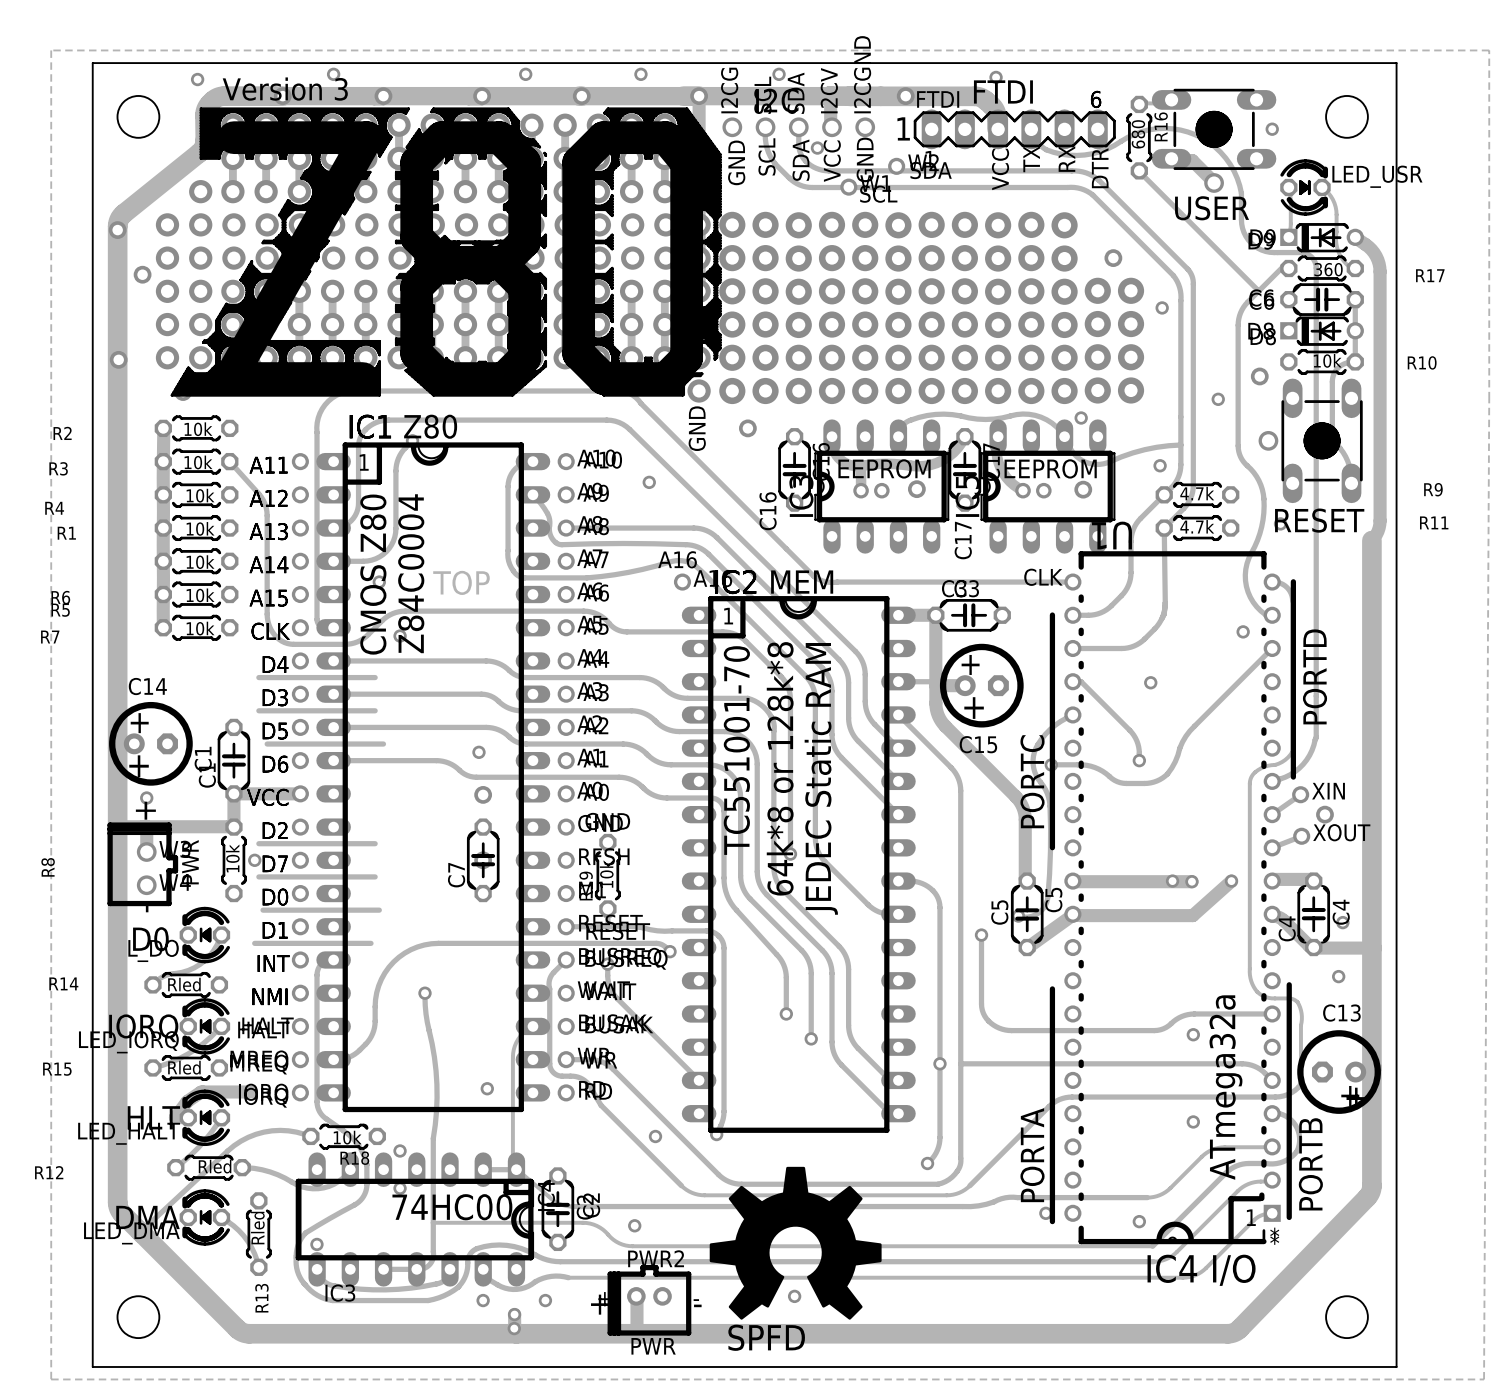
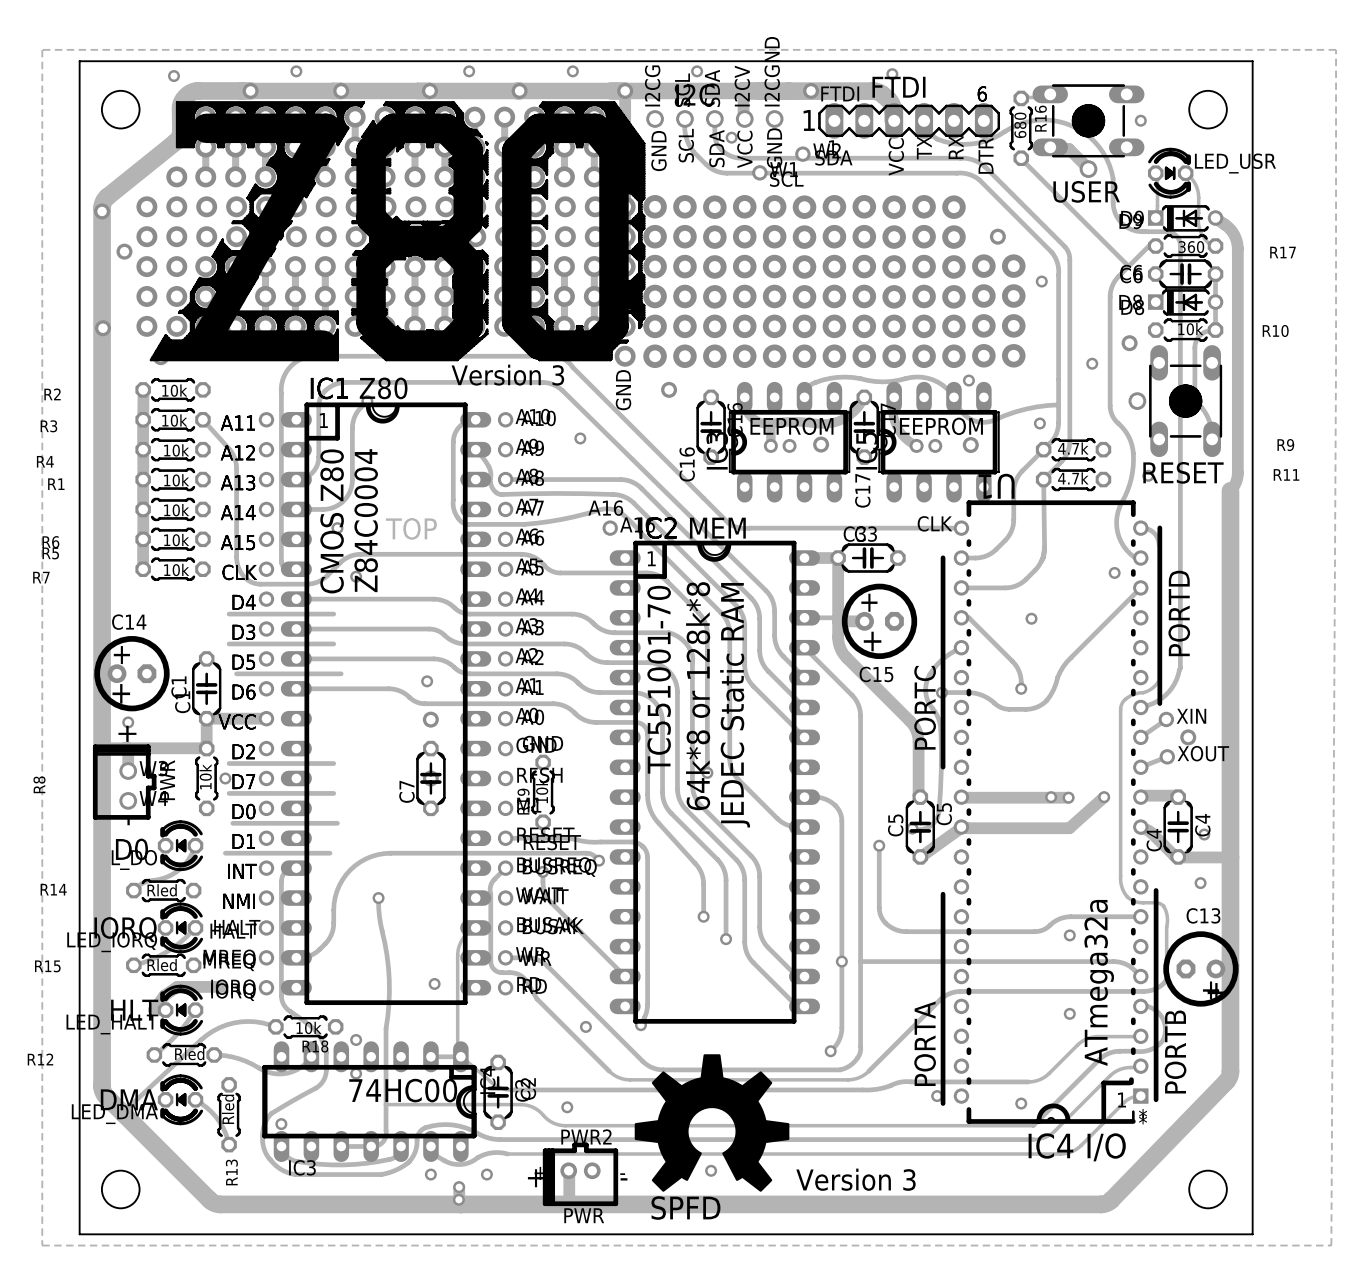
text: Version 3 (285, 89) -> none
text: none -> Version 3 (507, 375)
text: none -> Version 3 (855, 1179)

